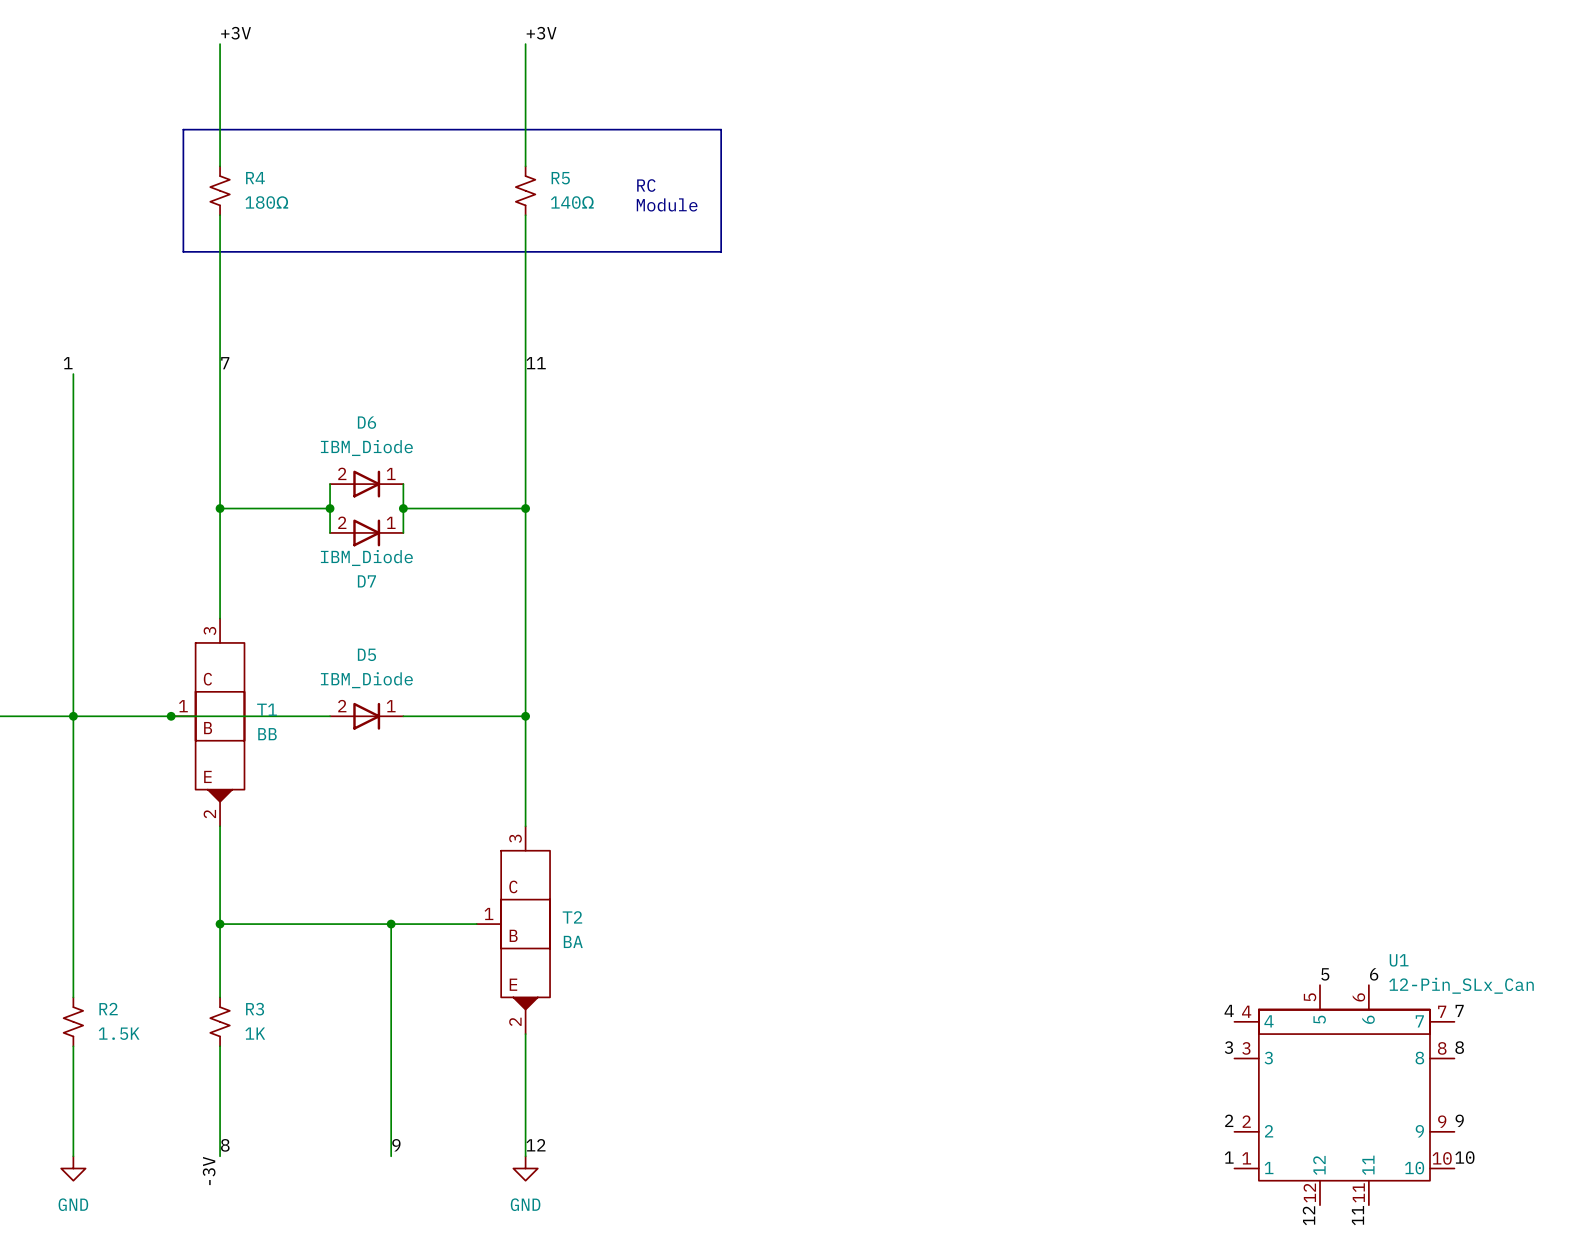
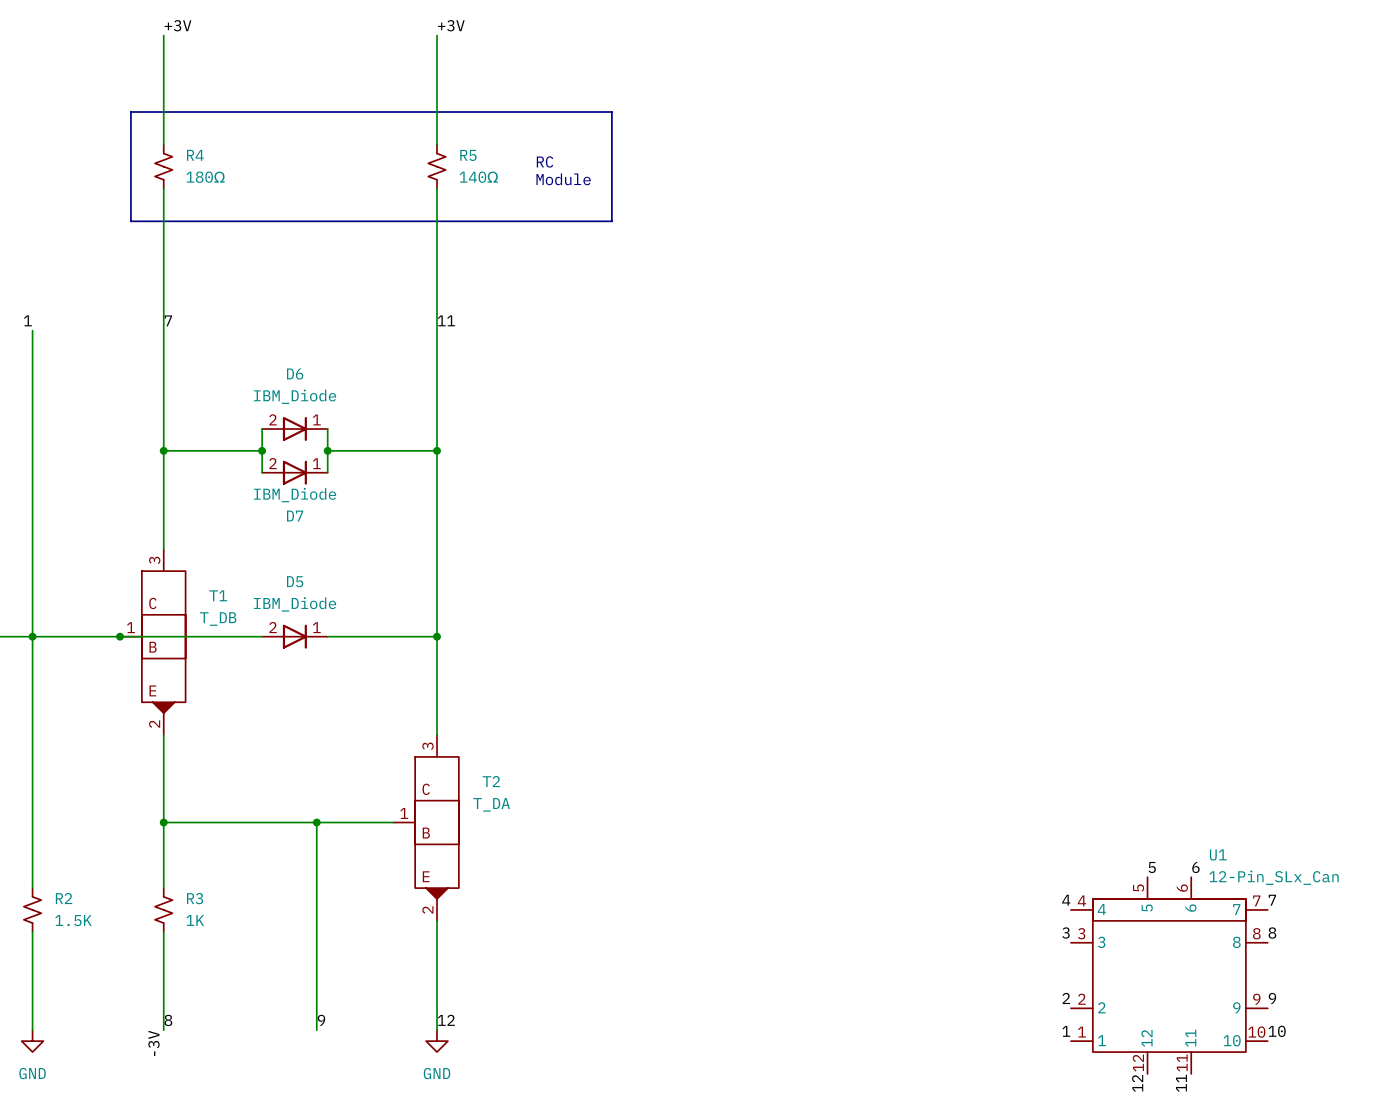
T1 name position: T1 (267, 709) -> T1 (218, 595)
T1 value: BB (267, 734) -> T_DB (218, 619)
T2 name position: T2 (572, 917) -> T2 (491, 781)
T2 value: BA (573, 941) -> T_DA (491, 804)

